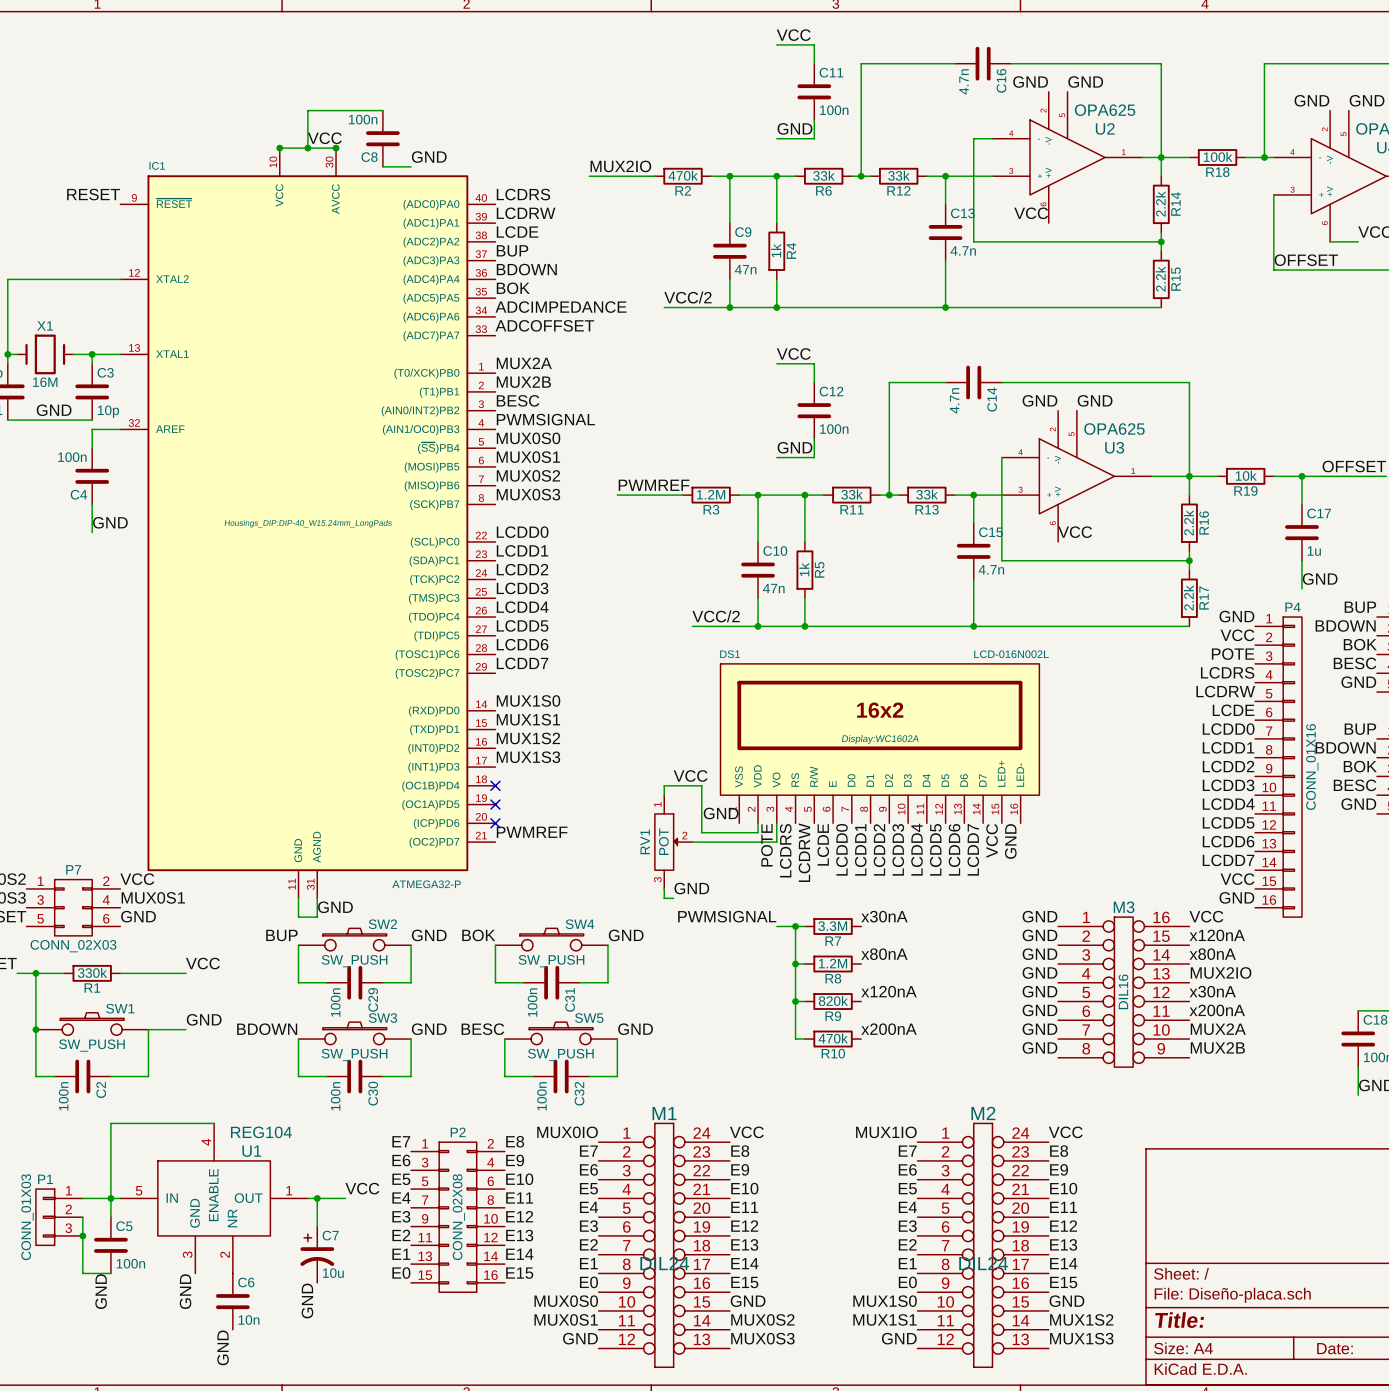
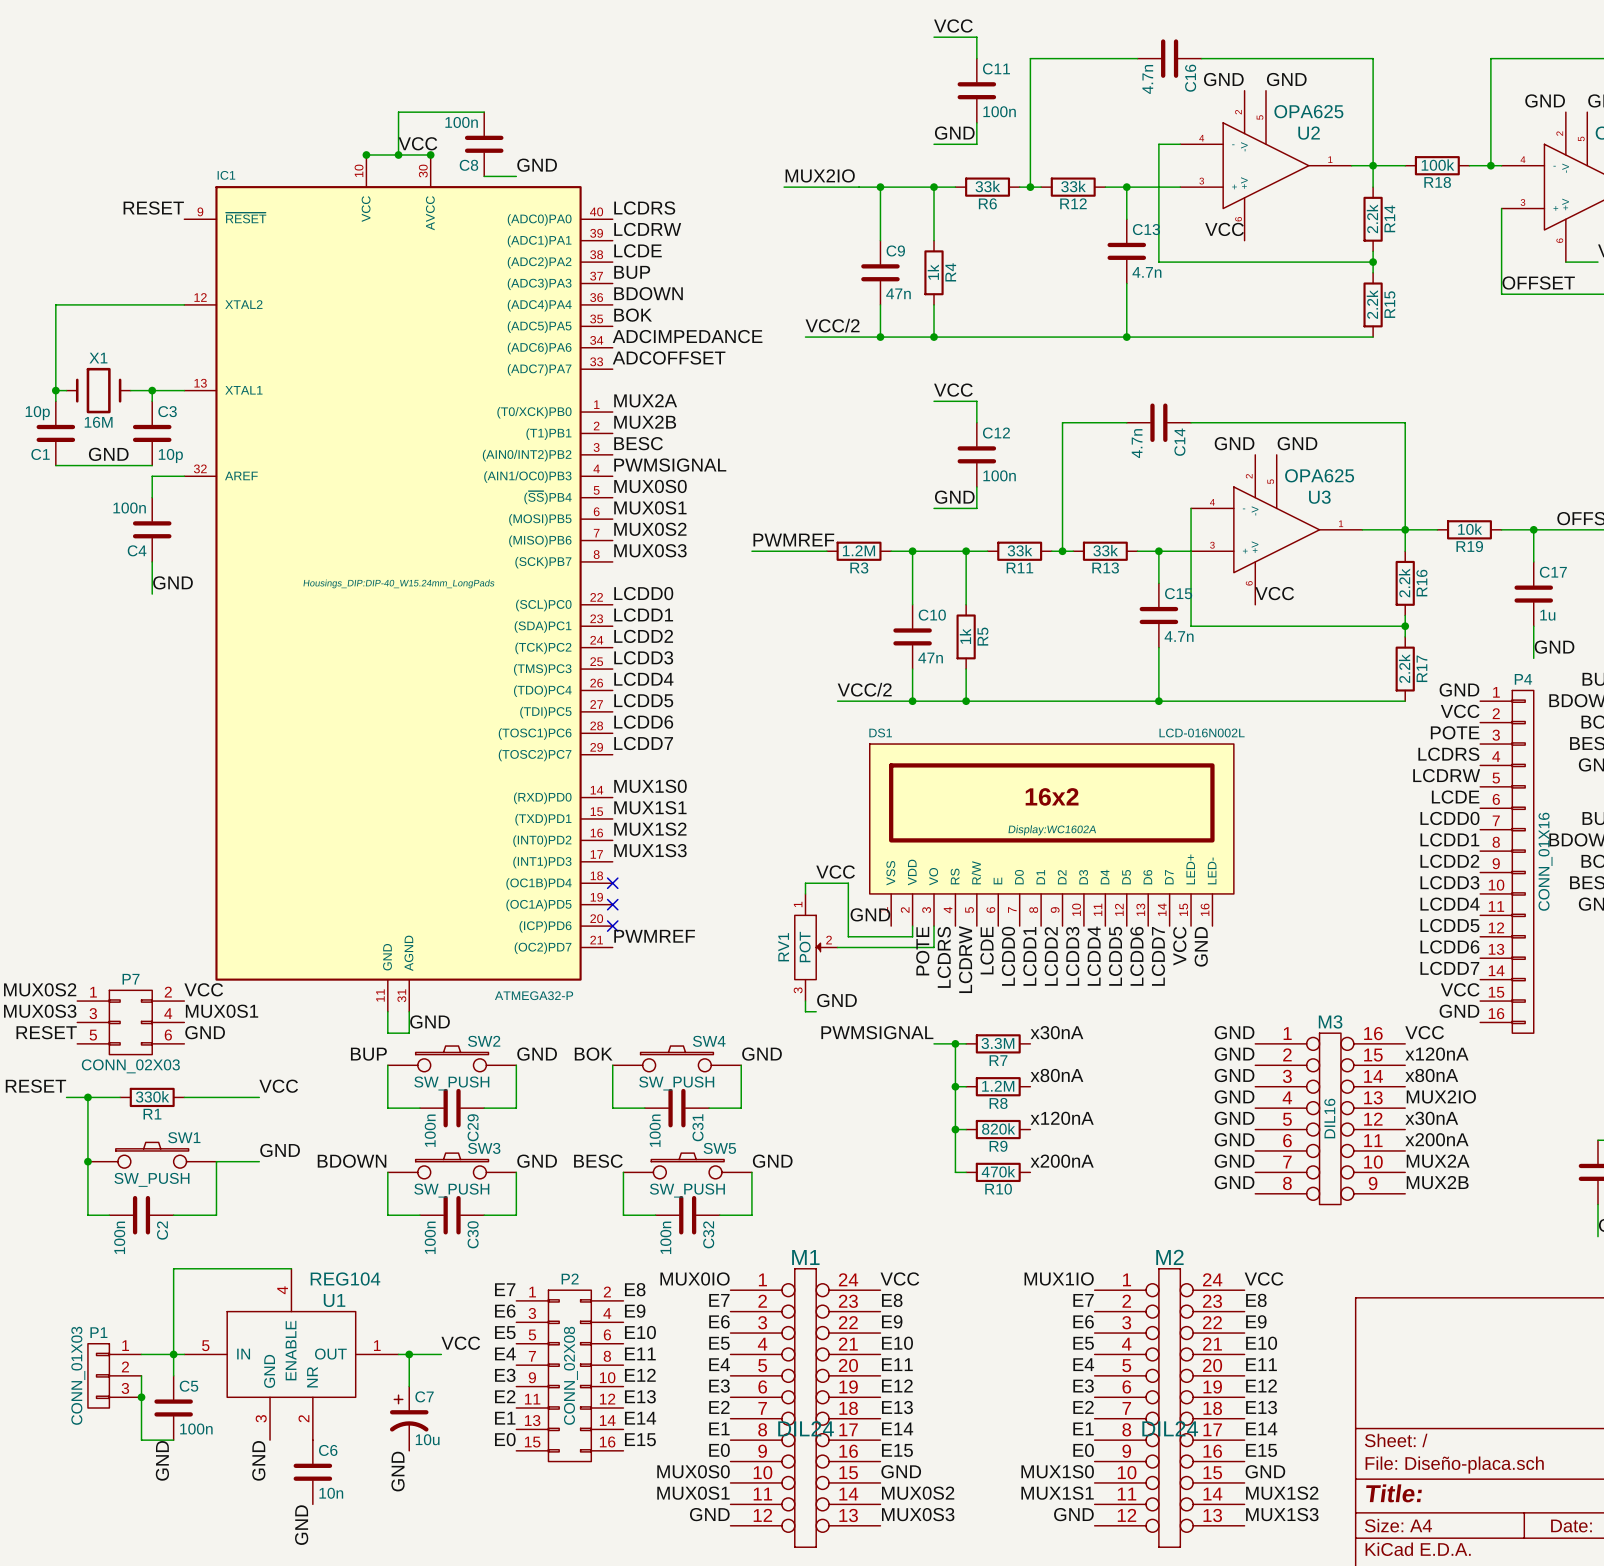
label position: MUX2IO (620, 166) -> MUX2IO (820, 175)
wire: (589, 176) (645, 176) -> (794, 187) (859, 187)
R2: 470k (683, 176) -> none

